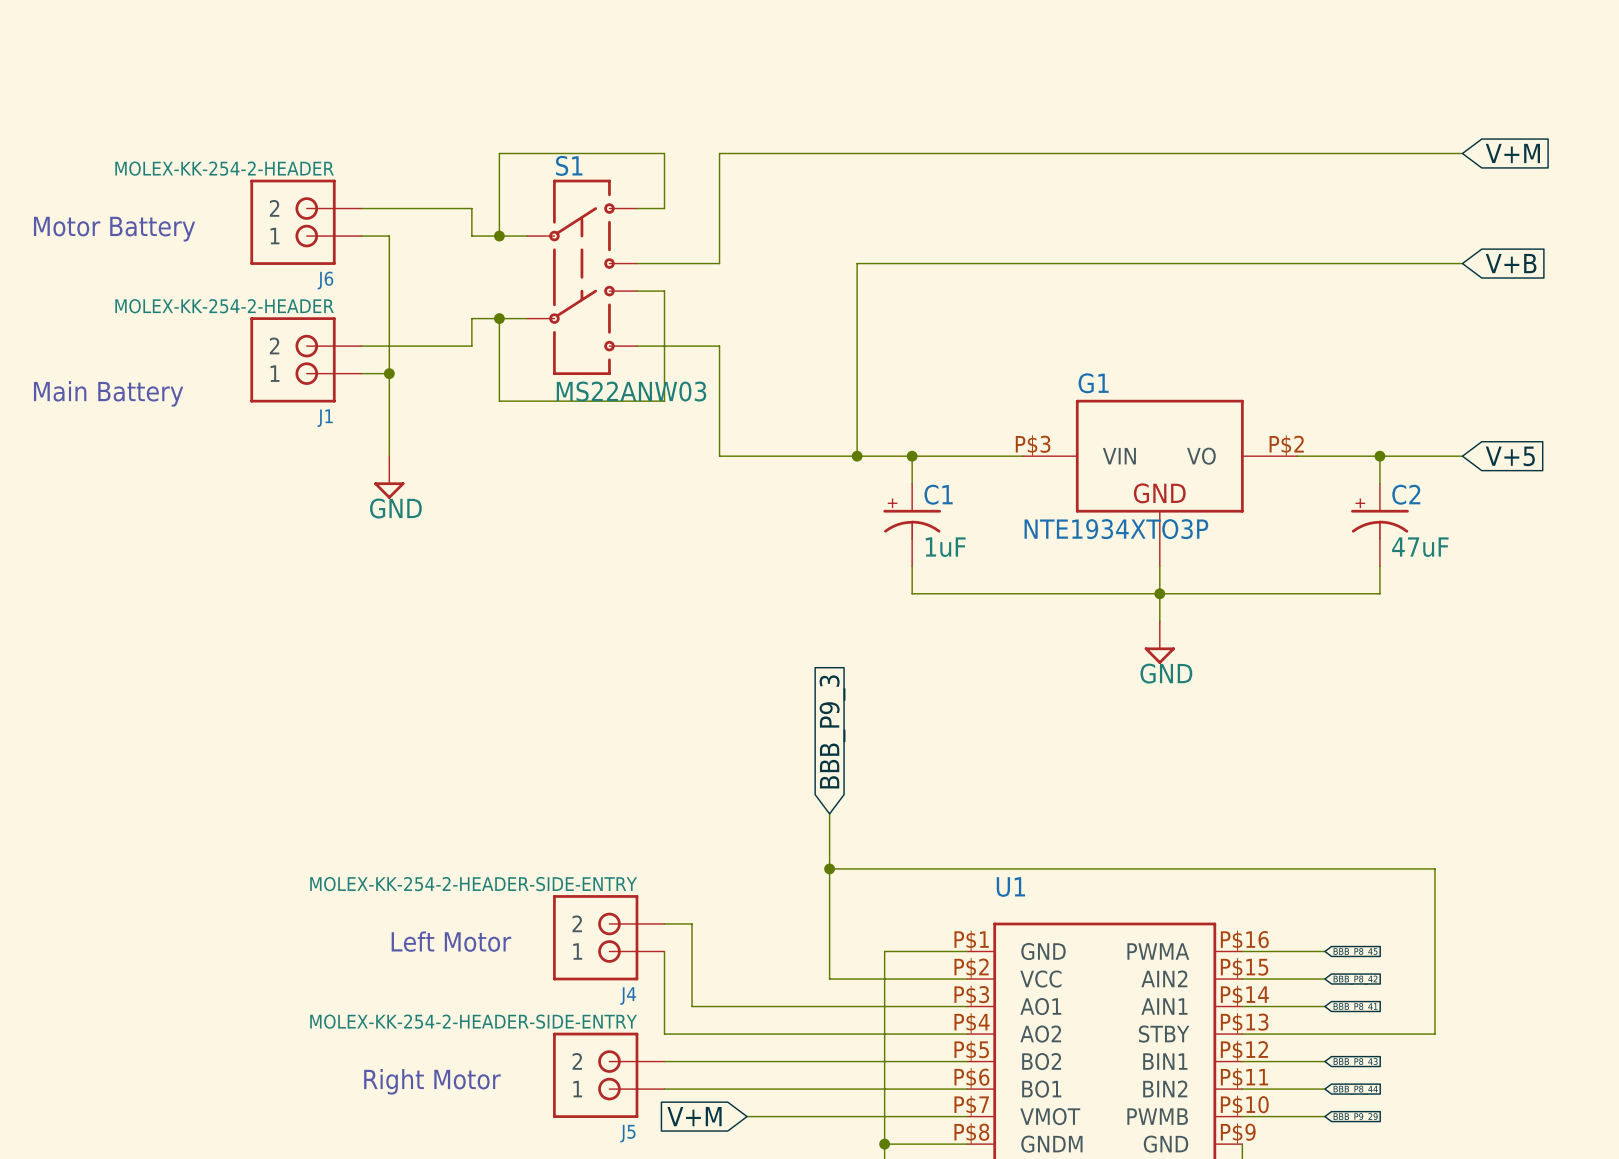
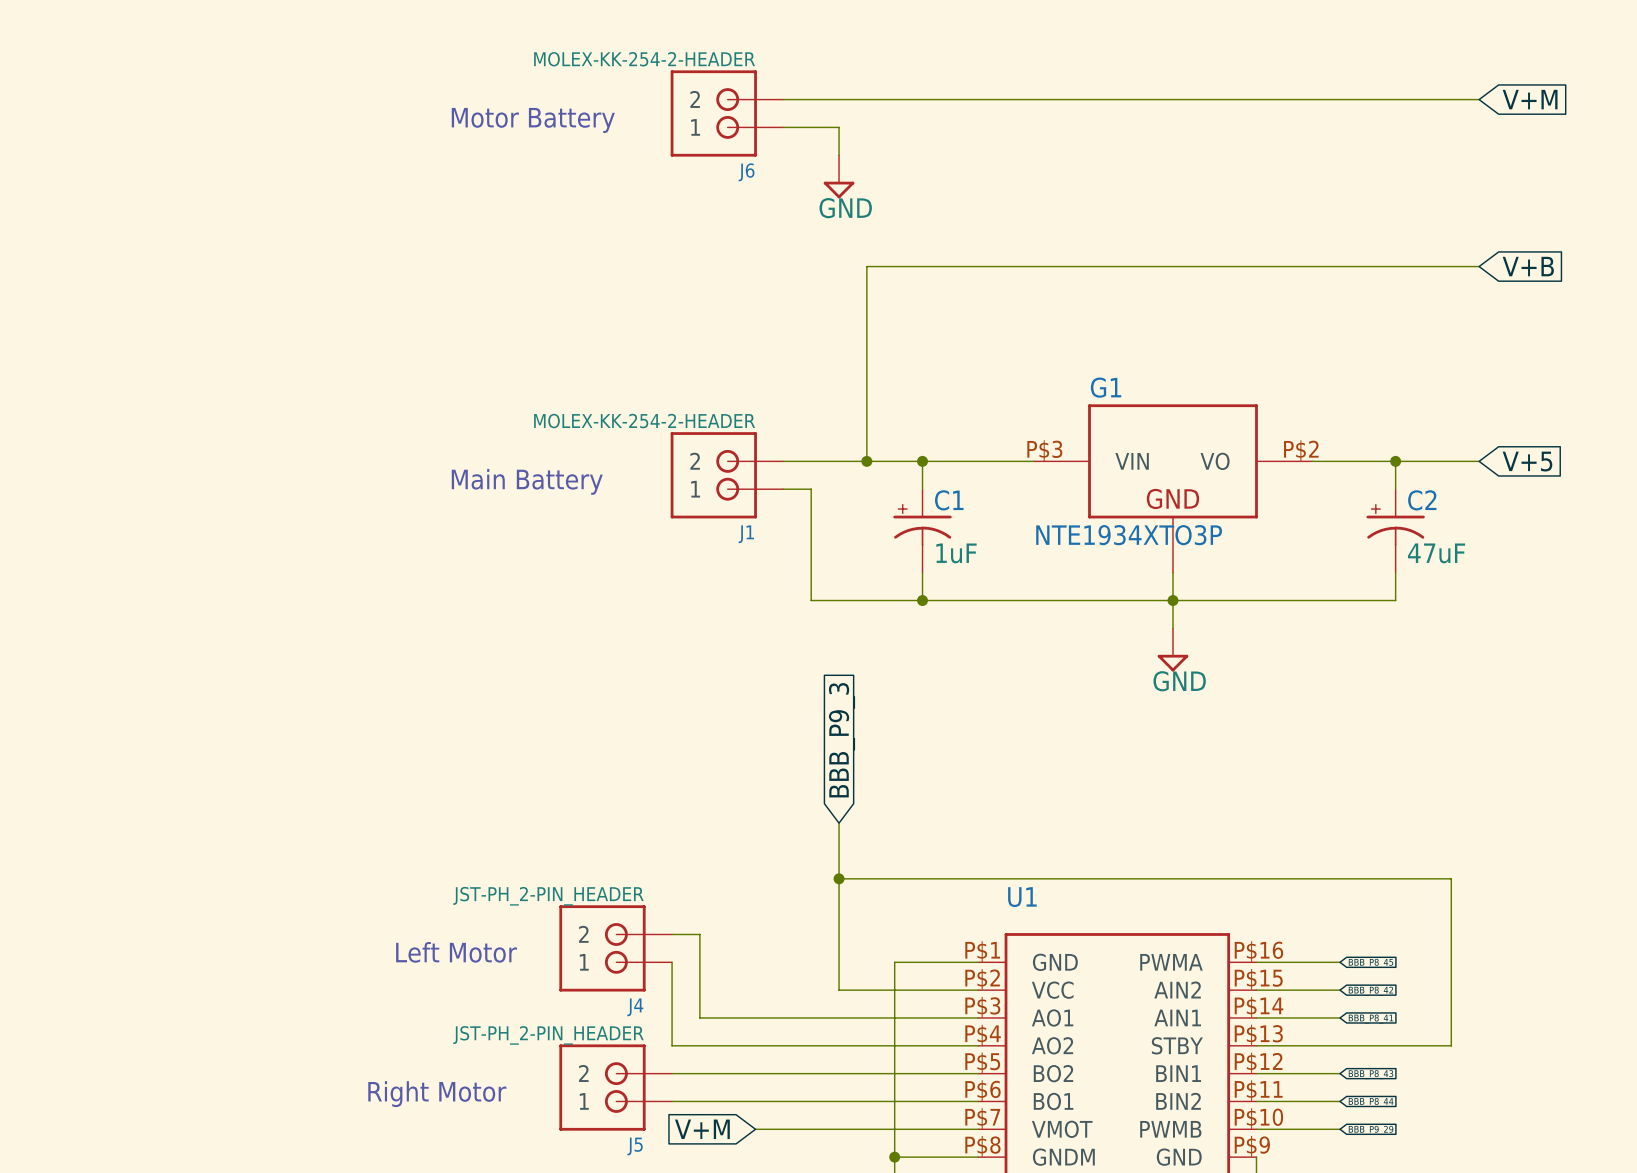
wire: none -> (783, 99) (1479, 99)
text: none -> Motor Battery (533, 120)
wire: none -> (783, 127) (839, 127) (839, 155)
wire: (1462, 153) (719, 153) (719, 263) (636, 263) -> none
global label position: V+M (1512, 153) -> V+M (1530, 99)
power symbol: none -> GND (839, 176)
wire: (361, 208) (471, 208) (471, 236) (526, 236) -> none
wire: (636, 208) (664, 208) (664, 153) (499, 153) (499, 236) -> none
J6 position: (306, 222) -> (727, 113)
text: Motor Battery (114, 229) -> none
wire: (361, 236) (389, 236) (389, 456) -> none
junction: (499, 236) -> none
S1: MS22ANW03 (581, 277) -> none
wire: (636, 291) (664, 291) (664, 401) (499, 401) (499, 318) -> none
junction: (499, 318) -> none
wire: (526, 318) (471, 318) (471, 346) (361, 346) -> none
wire: (636, 346) (719, 346) (719, 456) (774, 456) -> none
J1 position: (306, 359) -> (727, 475)
wire: (361, 373) (389, 373) -> none
junction: (389, 373) -> none
text: Main Battery (108, 393) -> none
text: none -> Main Battery (527, 481)
power symbol: GND (389, 477) -> none
wire: none -> (783, 489) (811, 489) (811, 600) (922, 600)
junction: none -> (922, 600)
J4 value: MOLEX-KK-254-2-HEADER-SIDE-ENTRY (473, 884) -> JST-PH_2-PIN_HEADER (548, 896)
J5 value: MOLEX-KK-254-2-HEADER-SIDE-ENTRY (473, 1021) -> JST-PH_2-PIN_HEADER (548, 1035)

